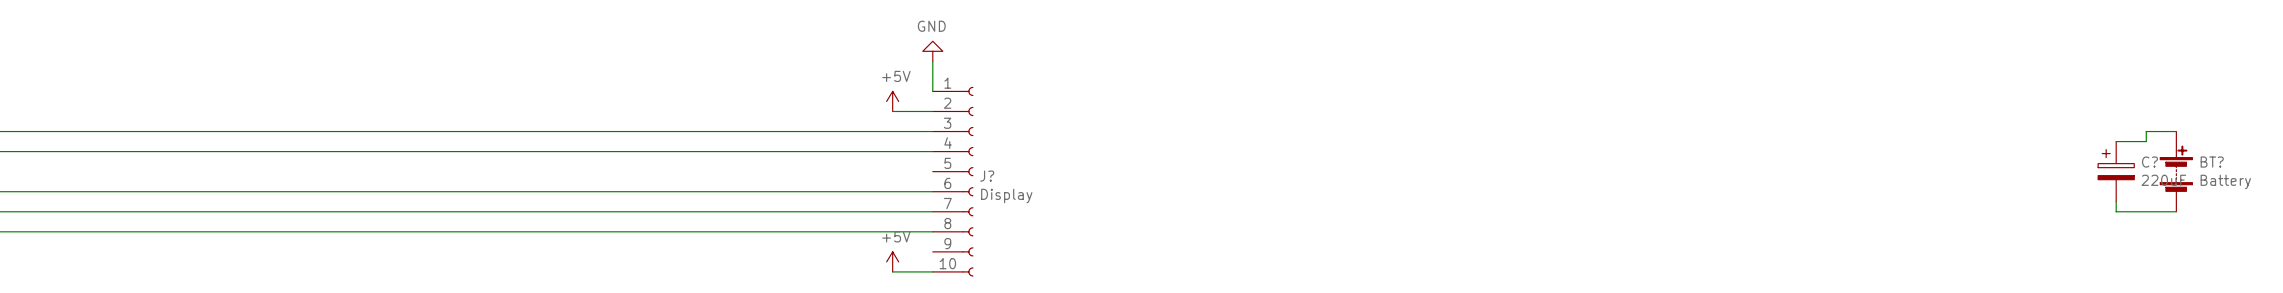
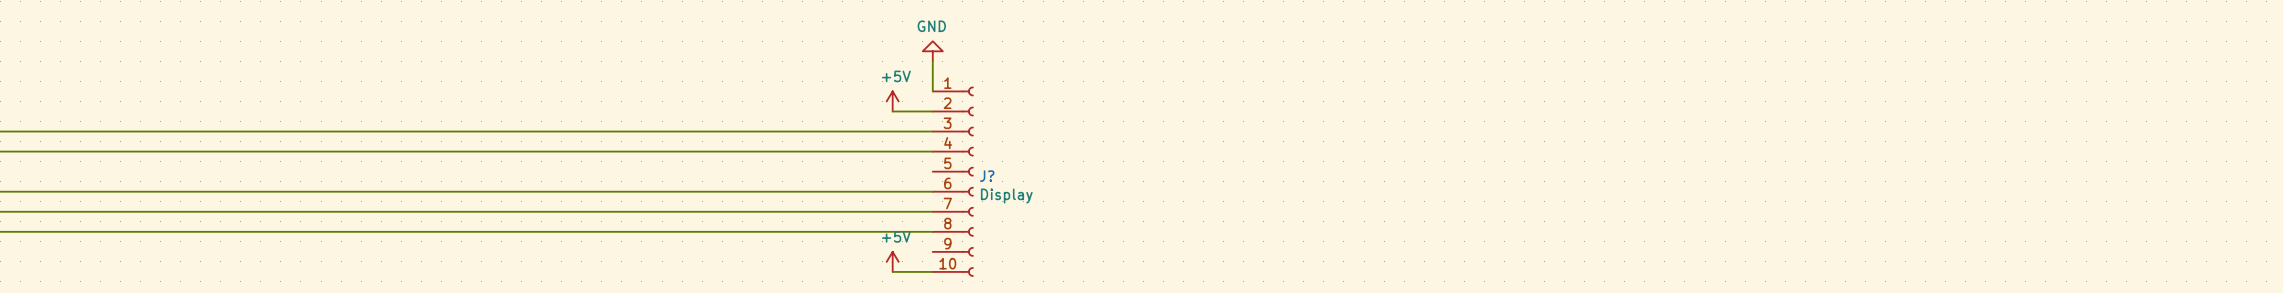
wire: (2176, 131) (2146, 131) (2146, 141) (2116, 141) -> none
C?: 220uF (2116, 171) -> none
BT?: Battery (2176, 171) -> none
wire: (2116, 201) (2116, 211) (2176, 211) -> none

